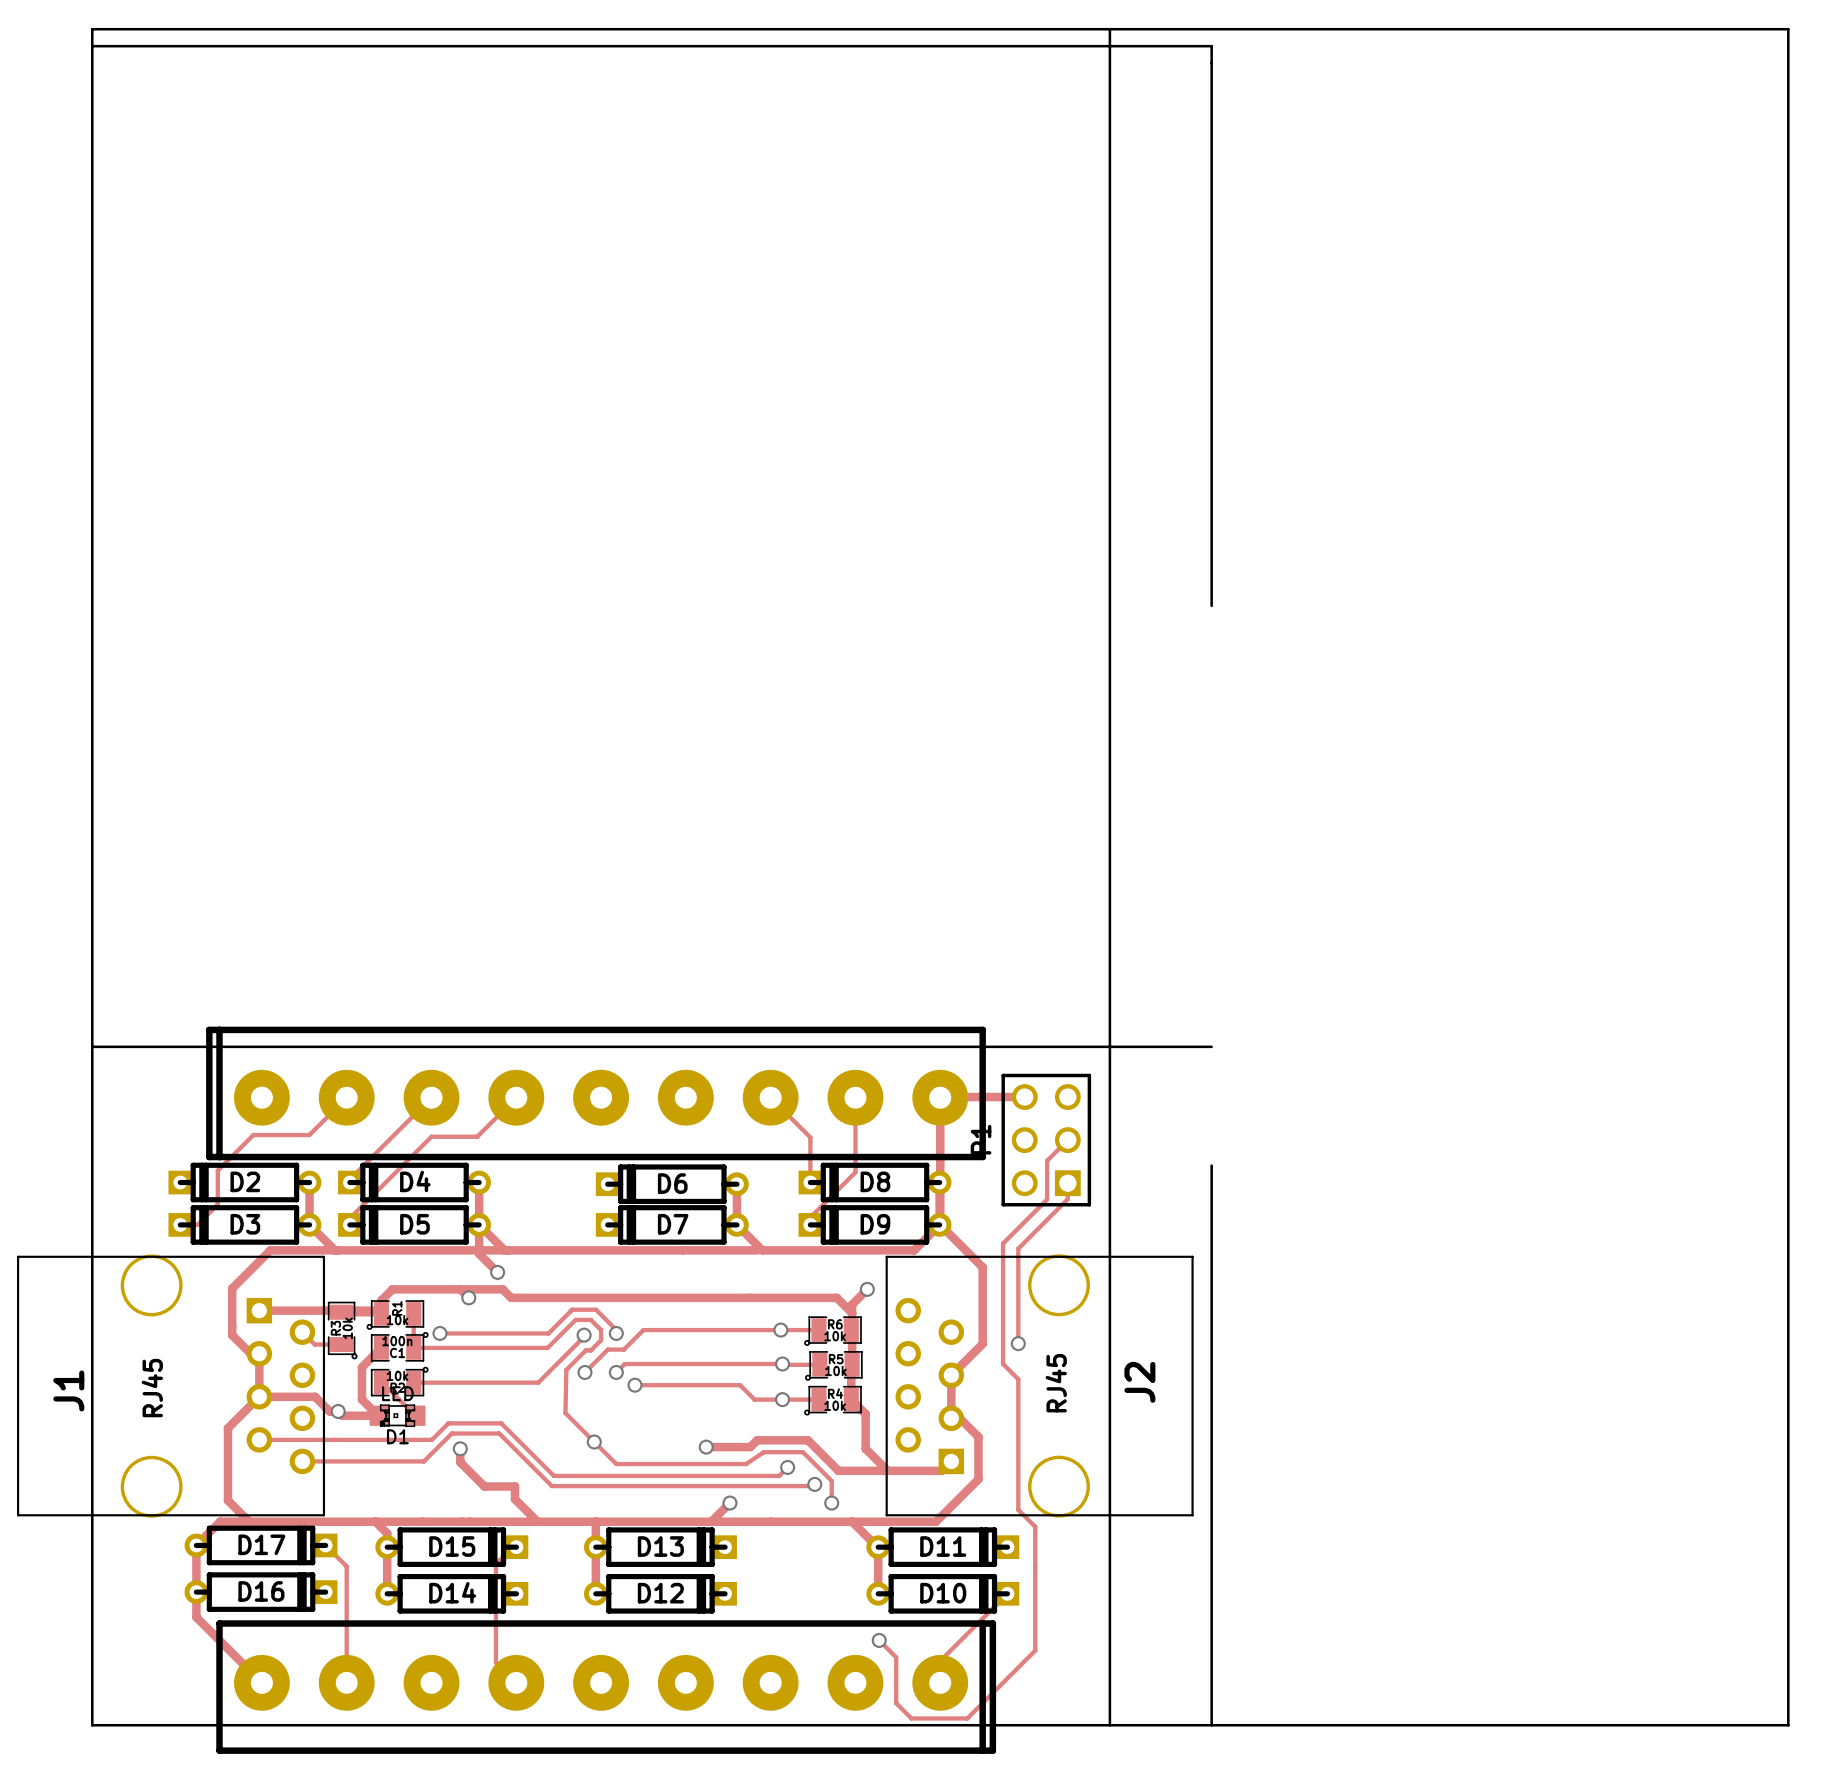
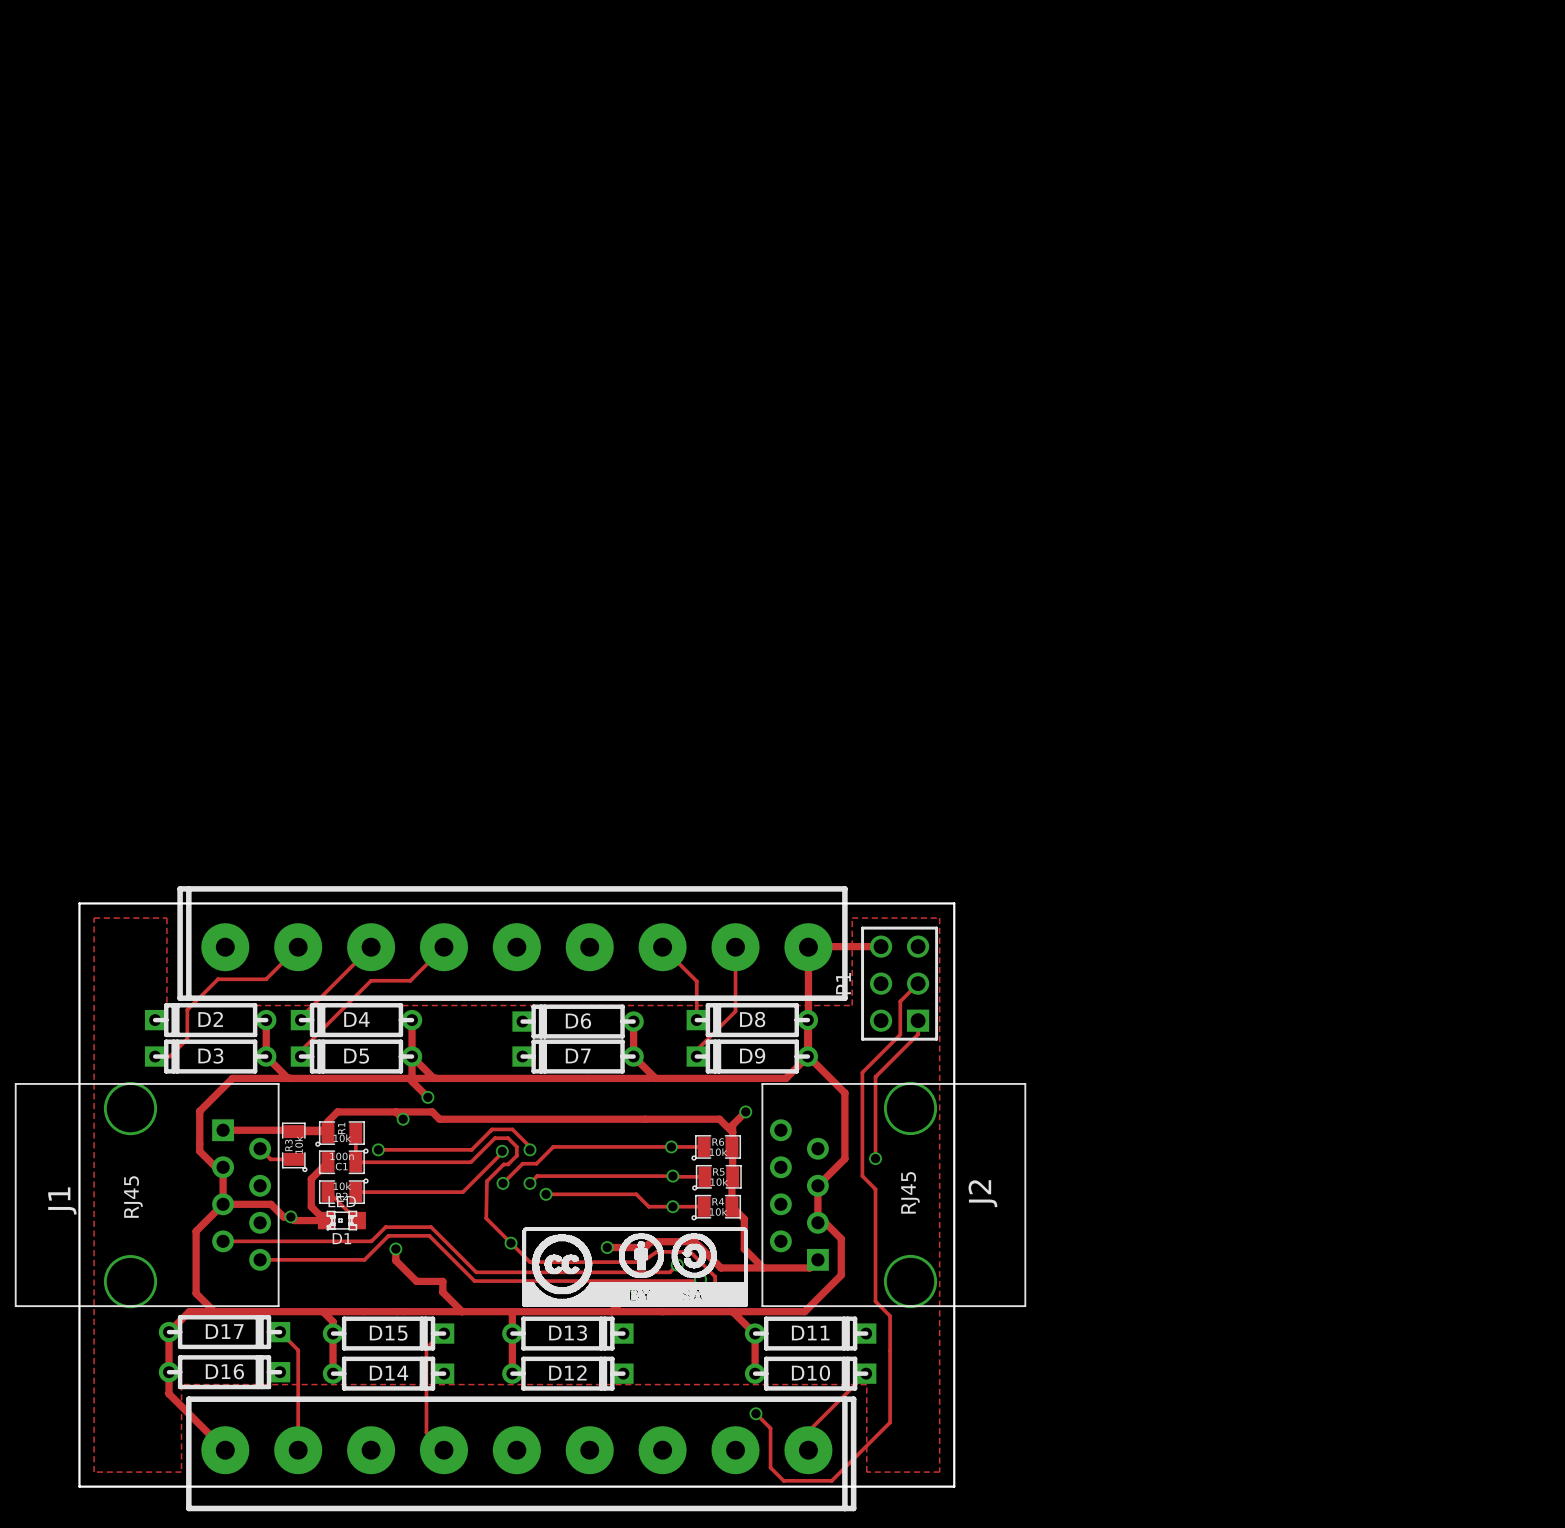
board edge: (1109, 29) (1109, 1046) (1211, 1046) -> none
board edge: (92, 46) (1211, 46) (1211, 605) -> none
board edge: (92, 1046) (92, 29) (1788, 29) (1788, 1725) (1109, 1725) -> none
zone outline: none -> (94, 918) (94, 1472) (181, 1472) (181, 1384) (866, 1384) (866, 1472) (939, 1472) (939, 918) (852, 918) (852, 1005) (166, 1005) (166, 918) (94, 918)
board edge: (1211, 1165) (1211, 1725) -> none
drawing: none -> [522, 1227, 748, 1307]

